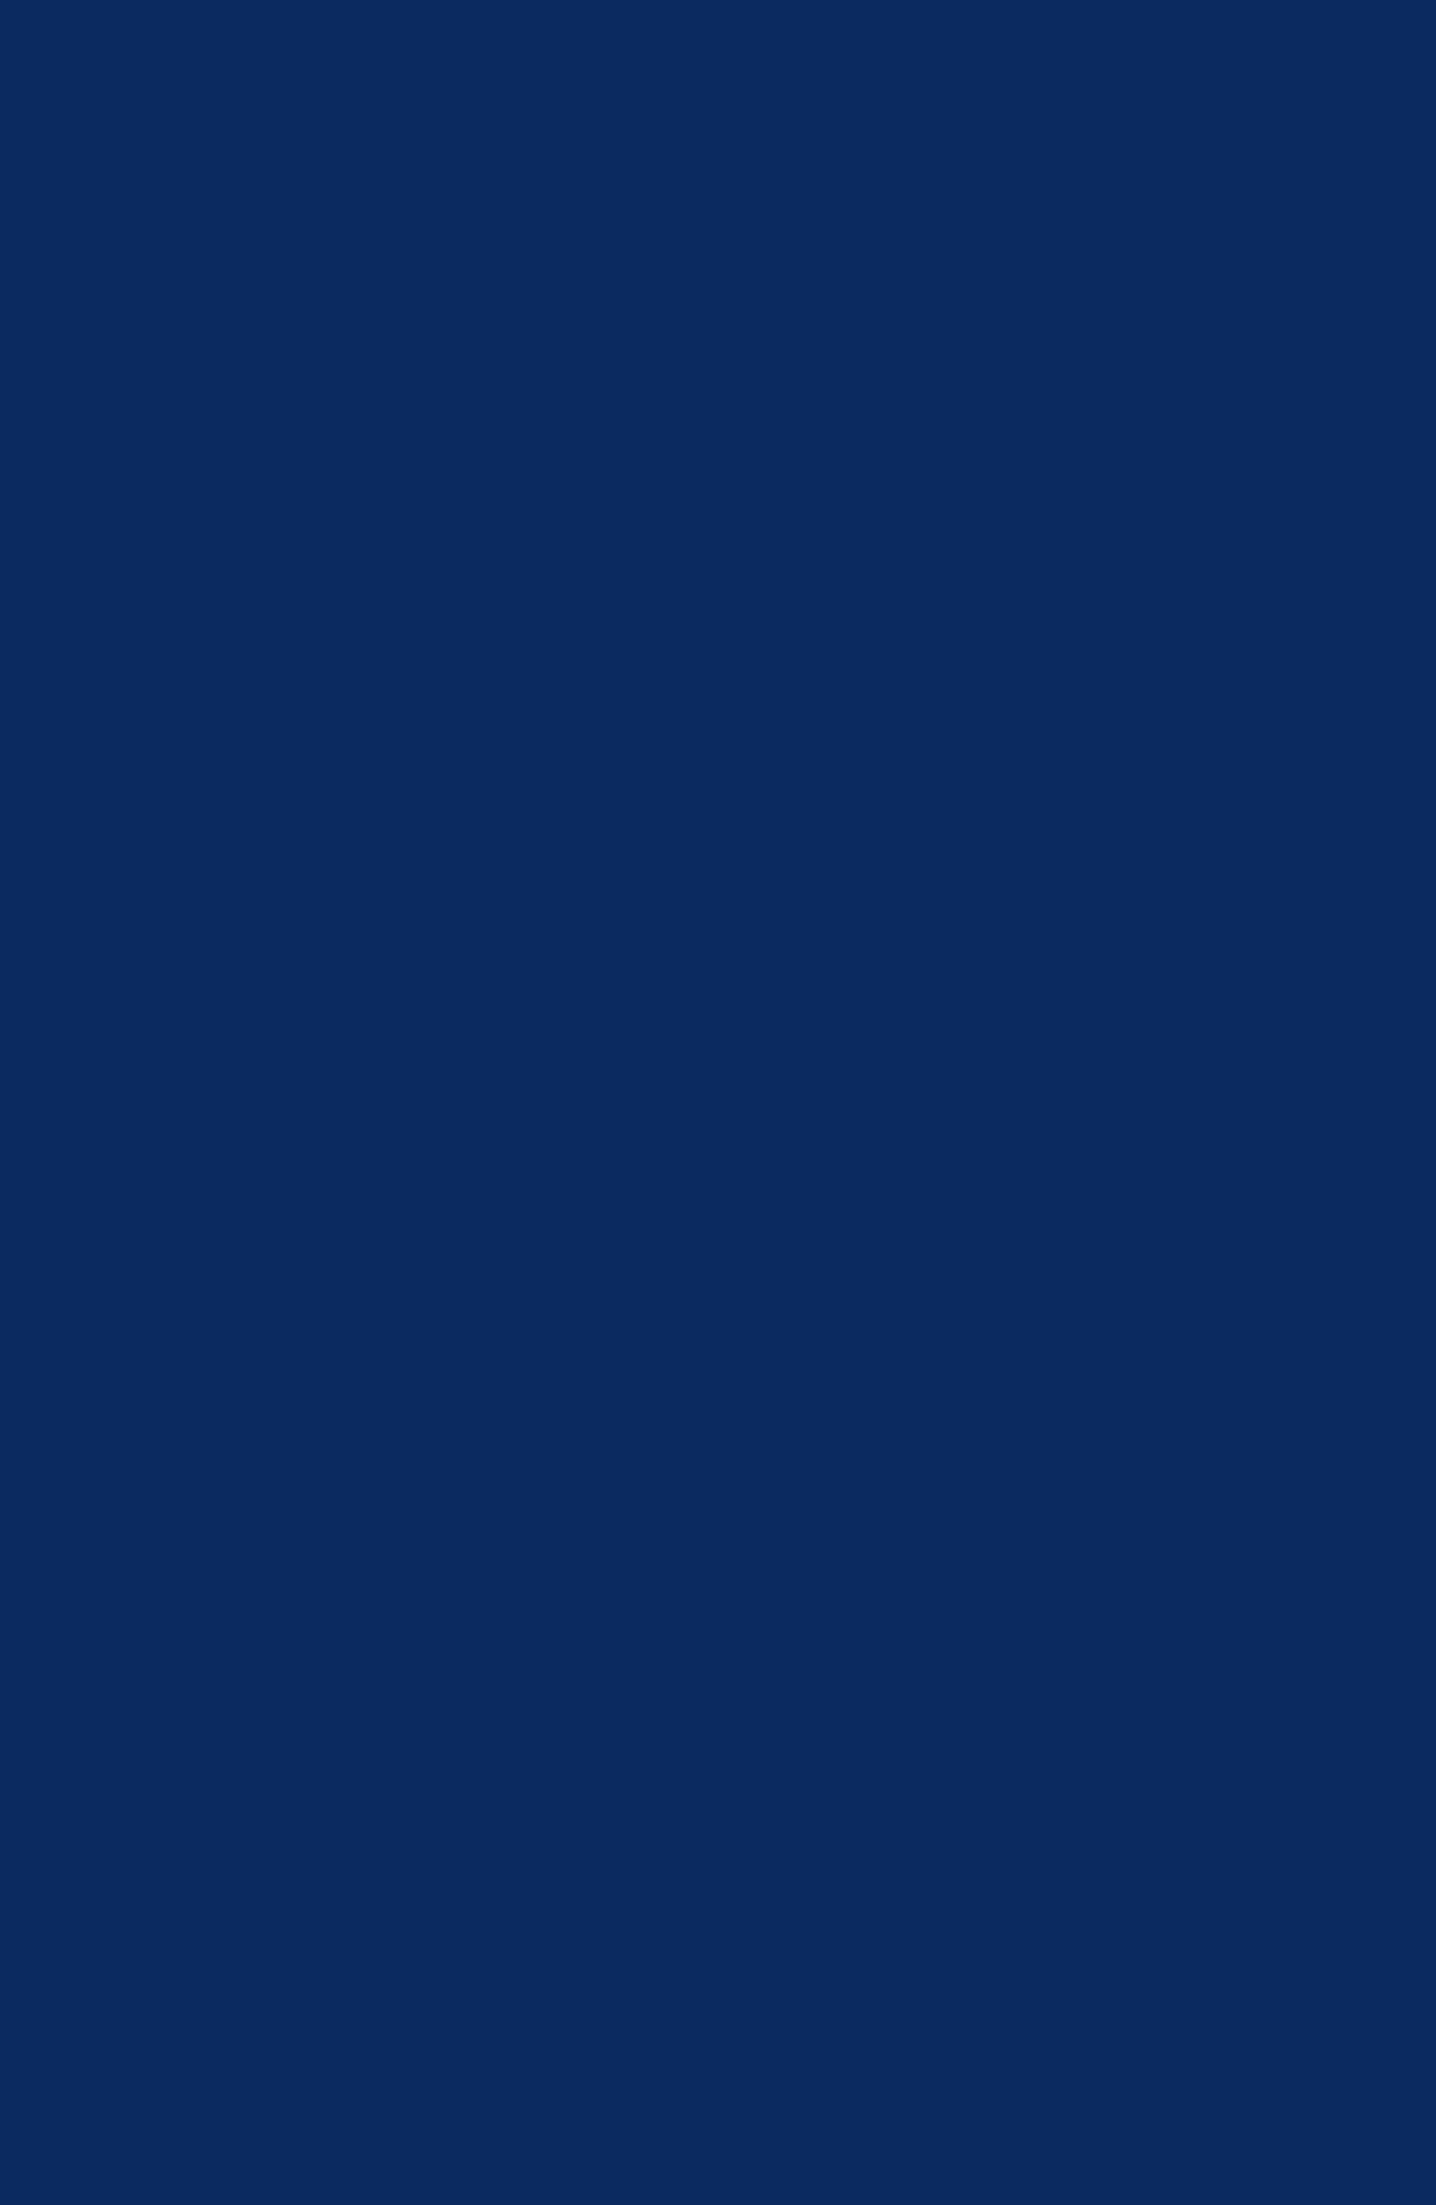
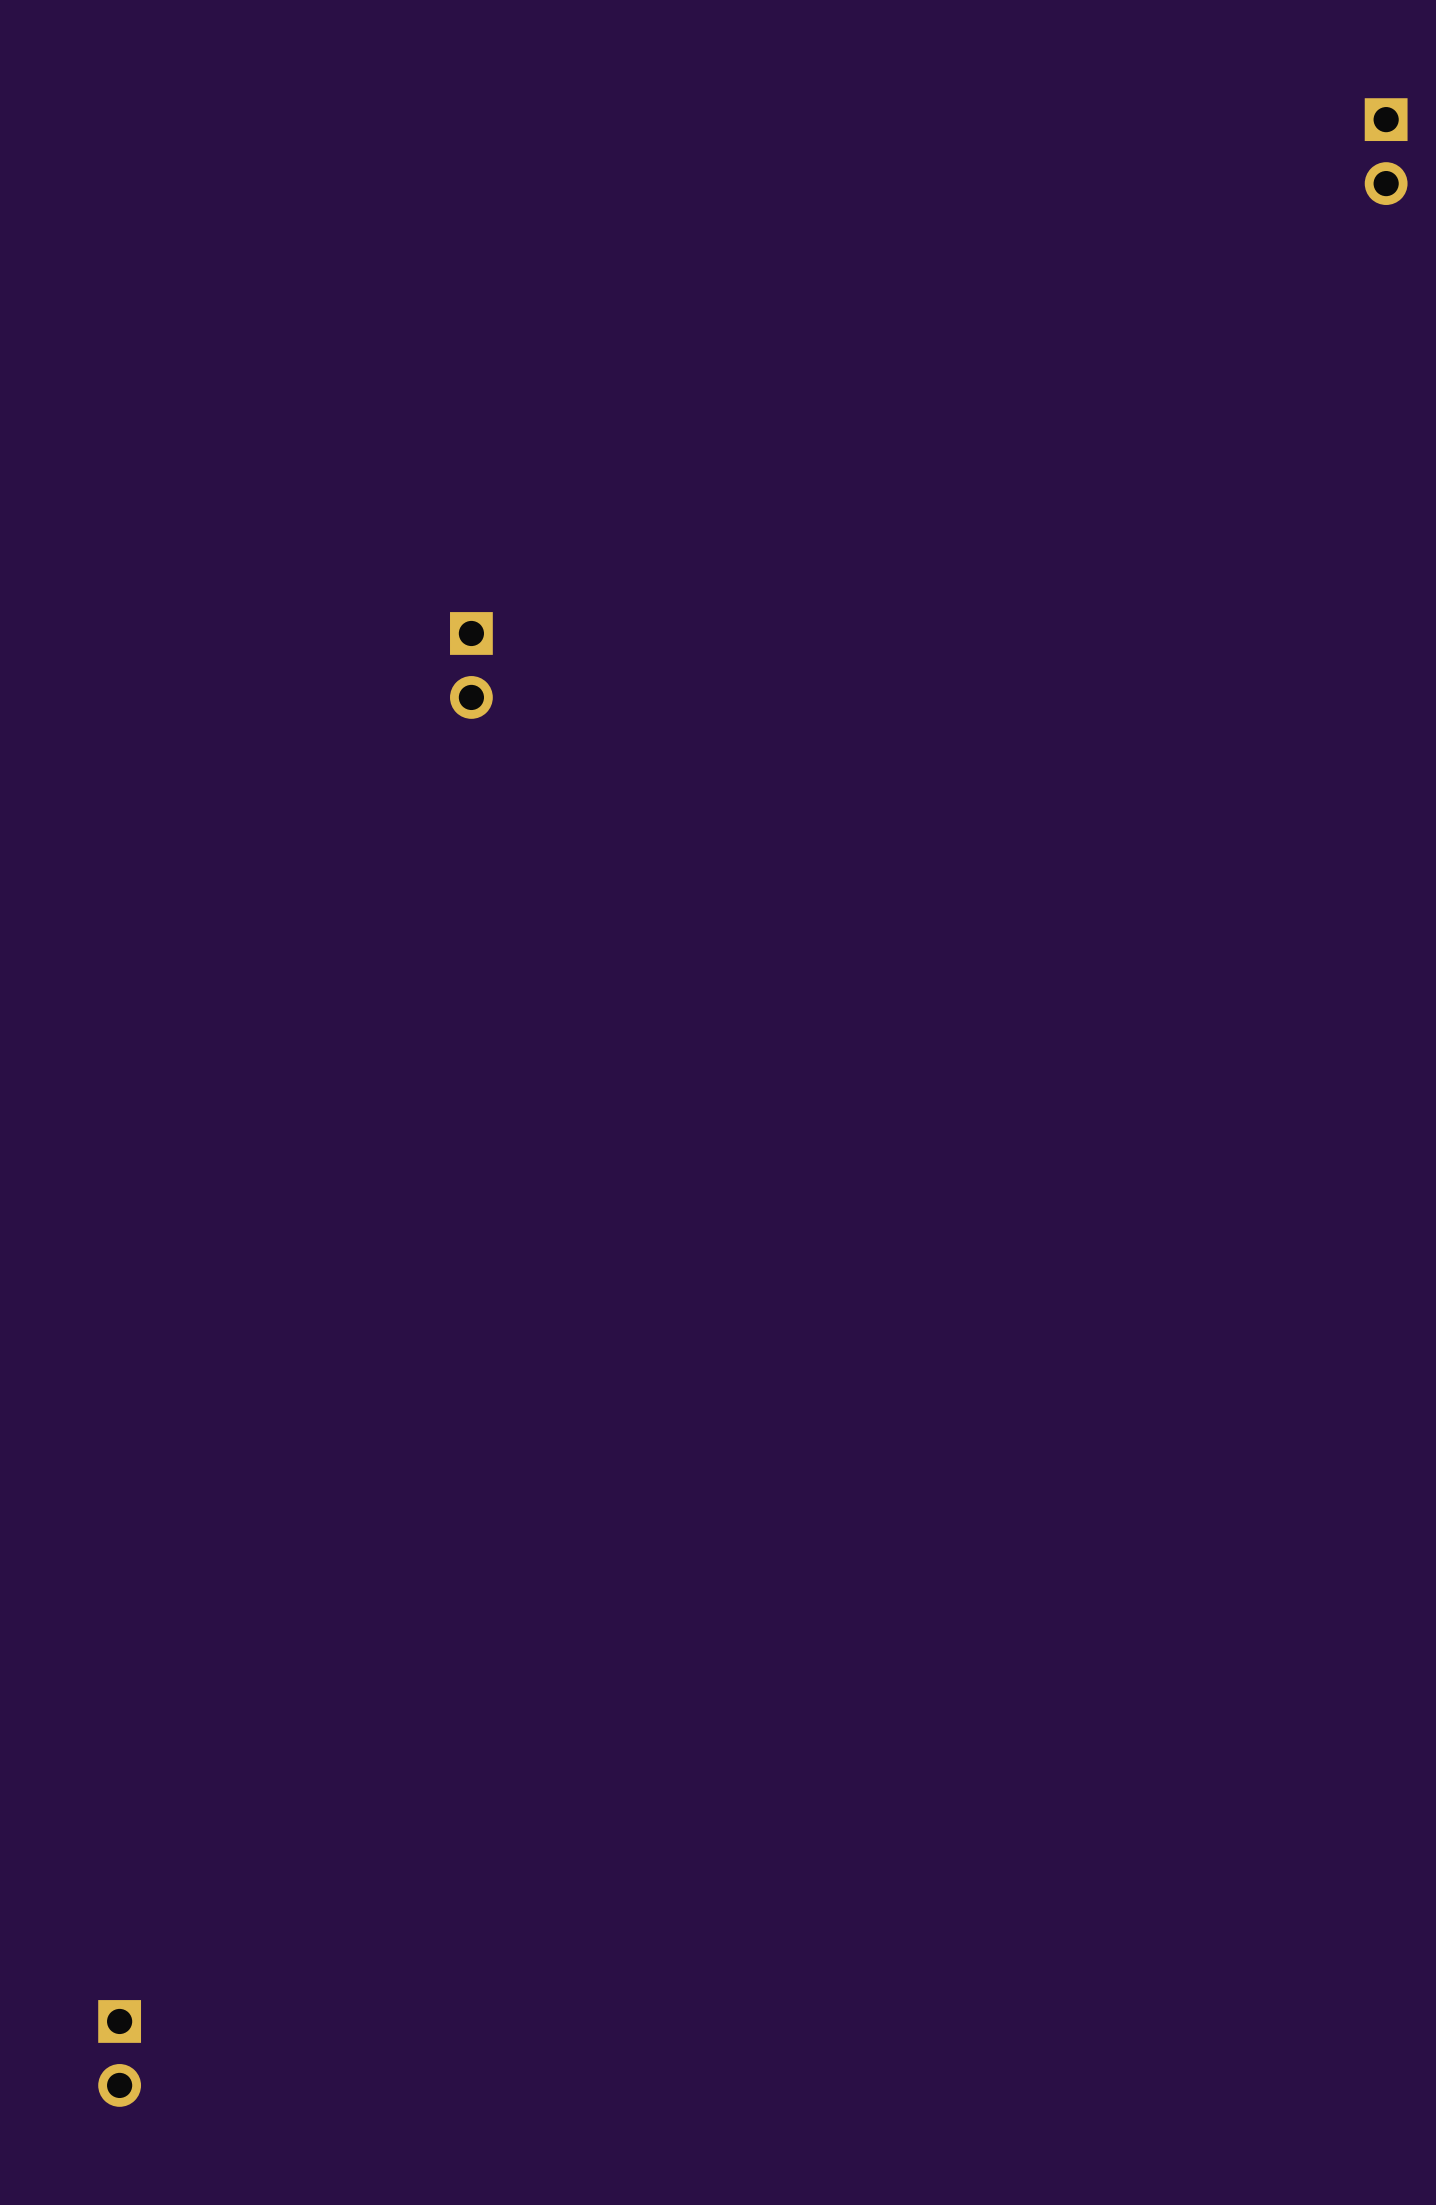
part: none -> (1386, 151)
part: none -> (471, 665)
part: none -> (119, 2053)

